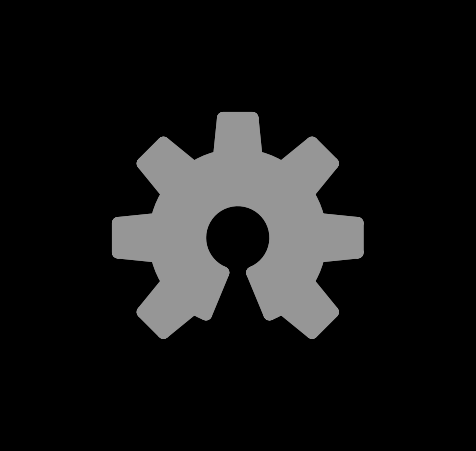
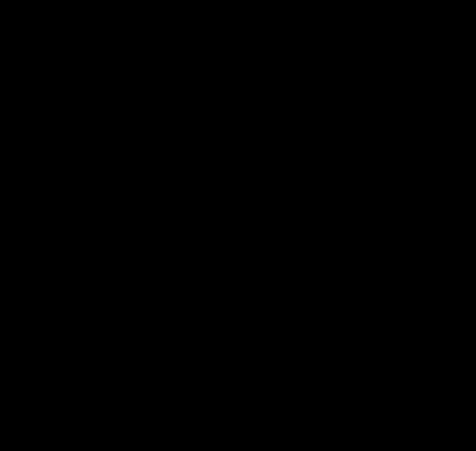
drawing: [111, 111, 364, 339] -> none

